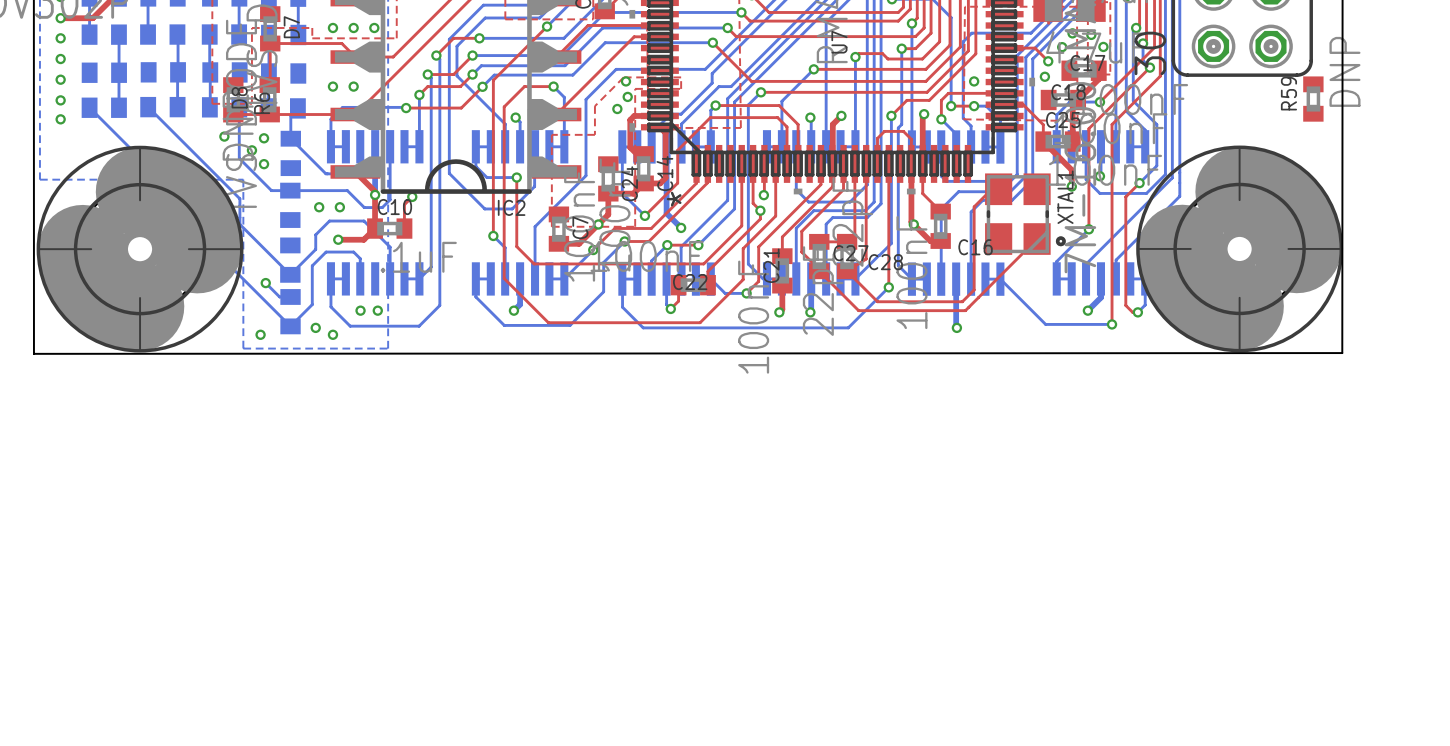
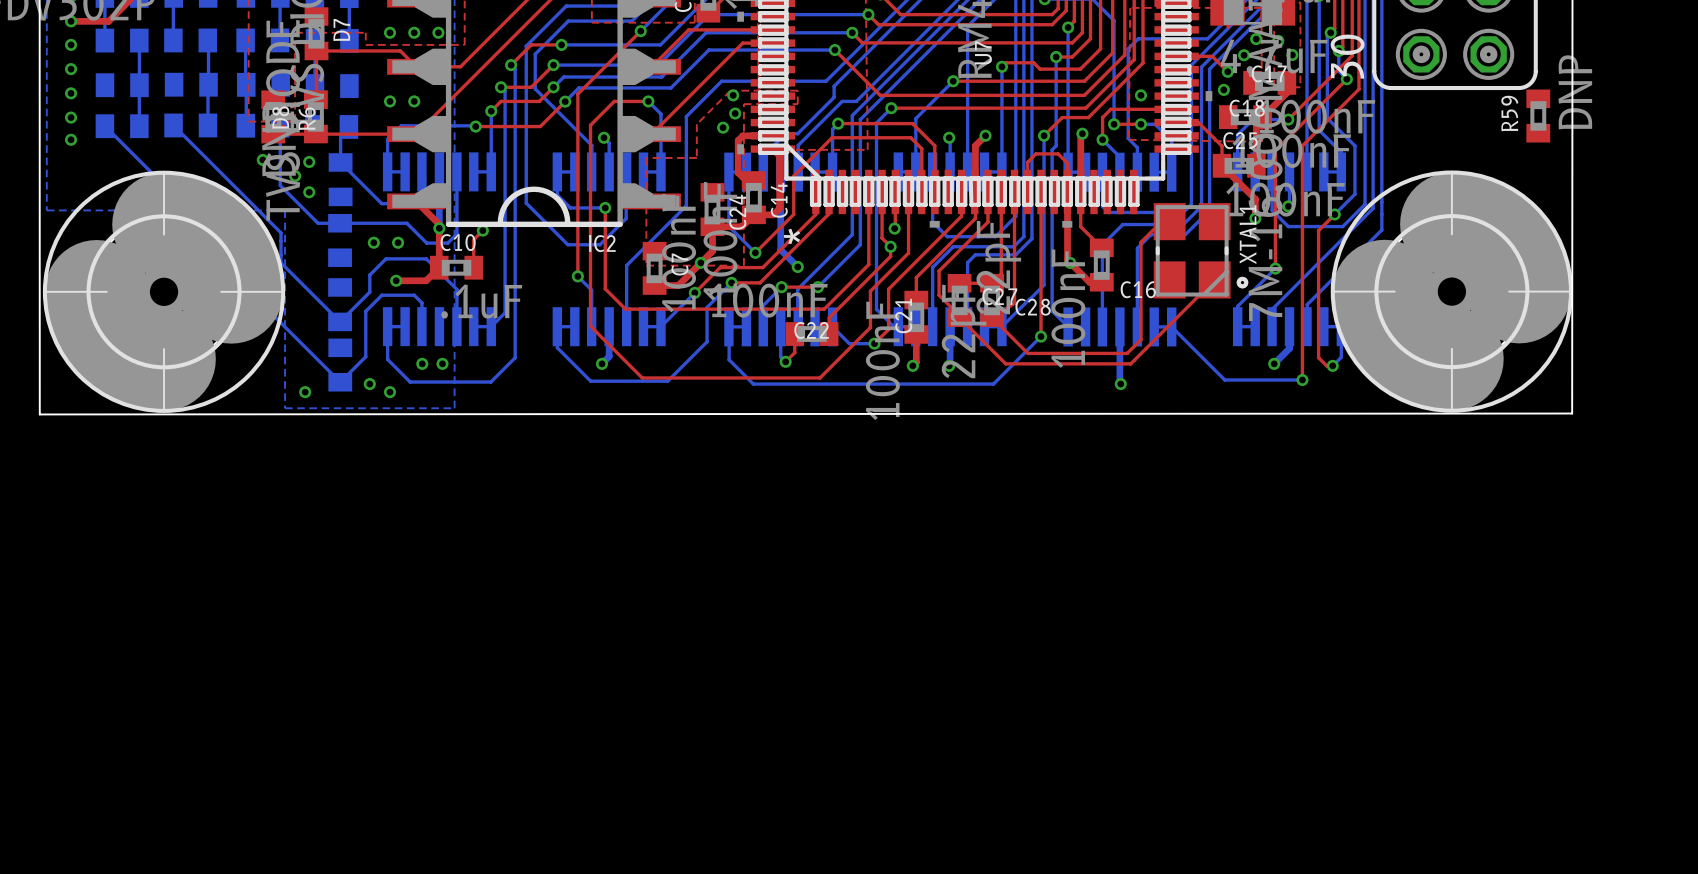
bottom track: (265, 283) (279, 296) (290, 296) -> none
via: (265, 283) -> none

